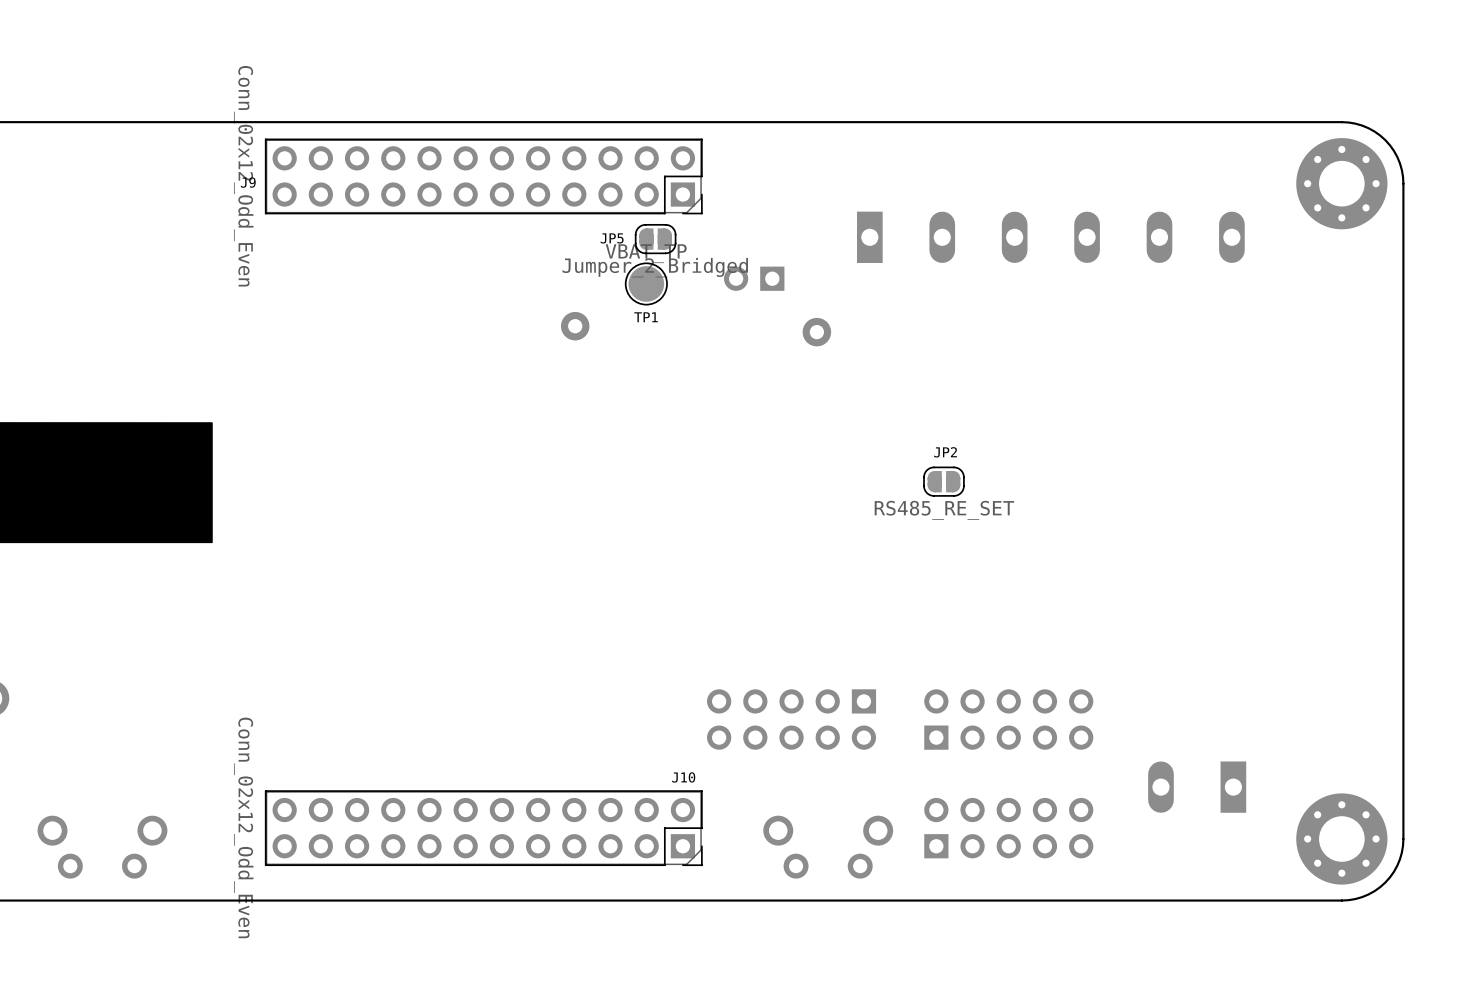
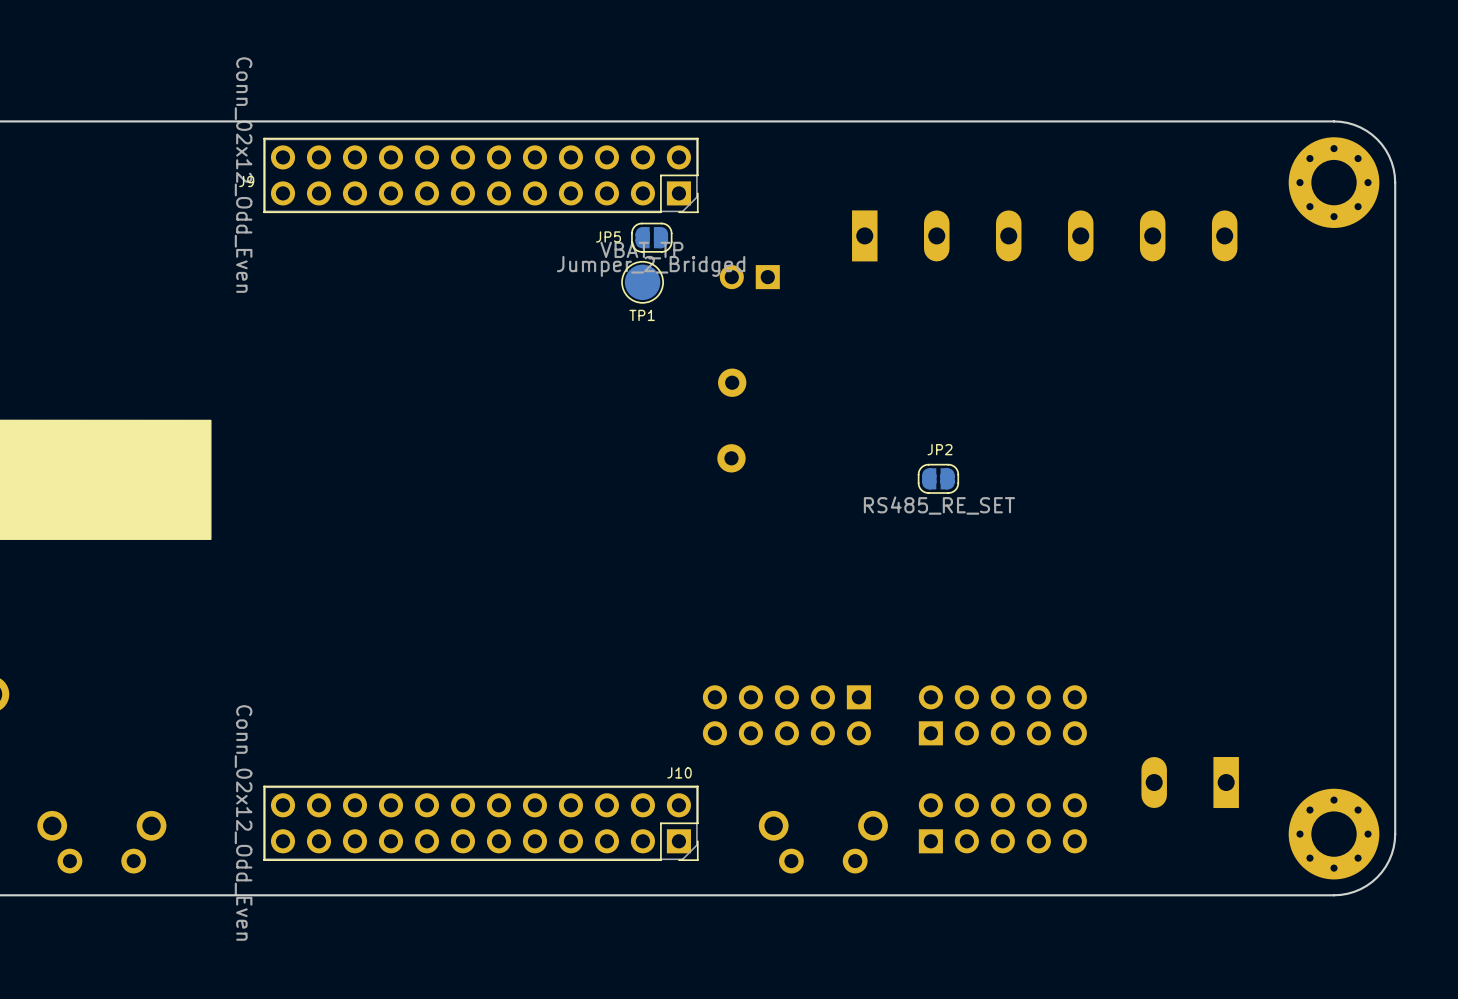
part: (575, 326) -> none
part: (816, 332) -> none
part: none -> (732, 382)
part: none -> (731, 458)

